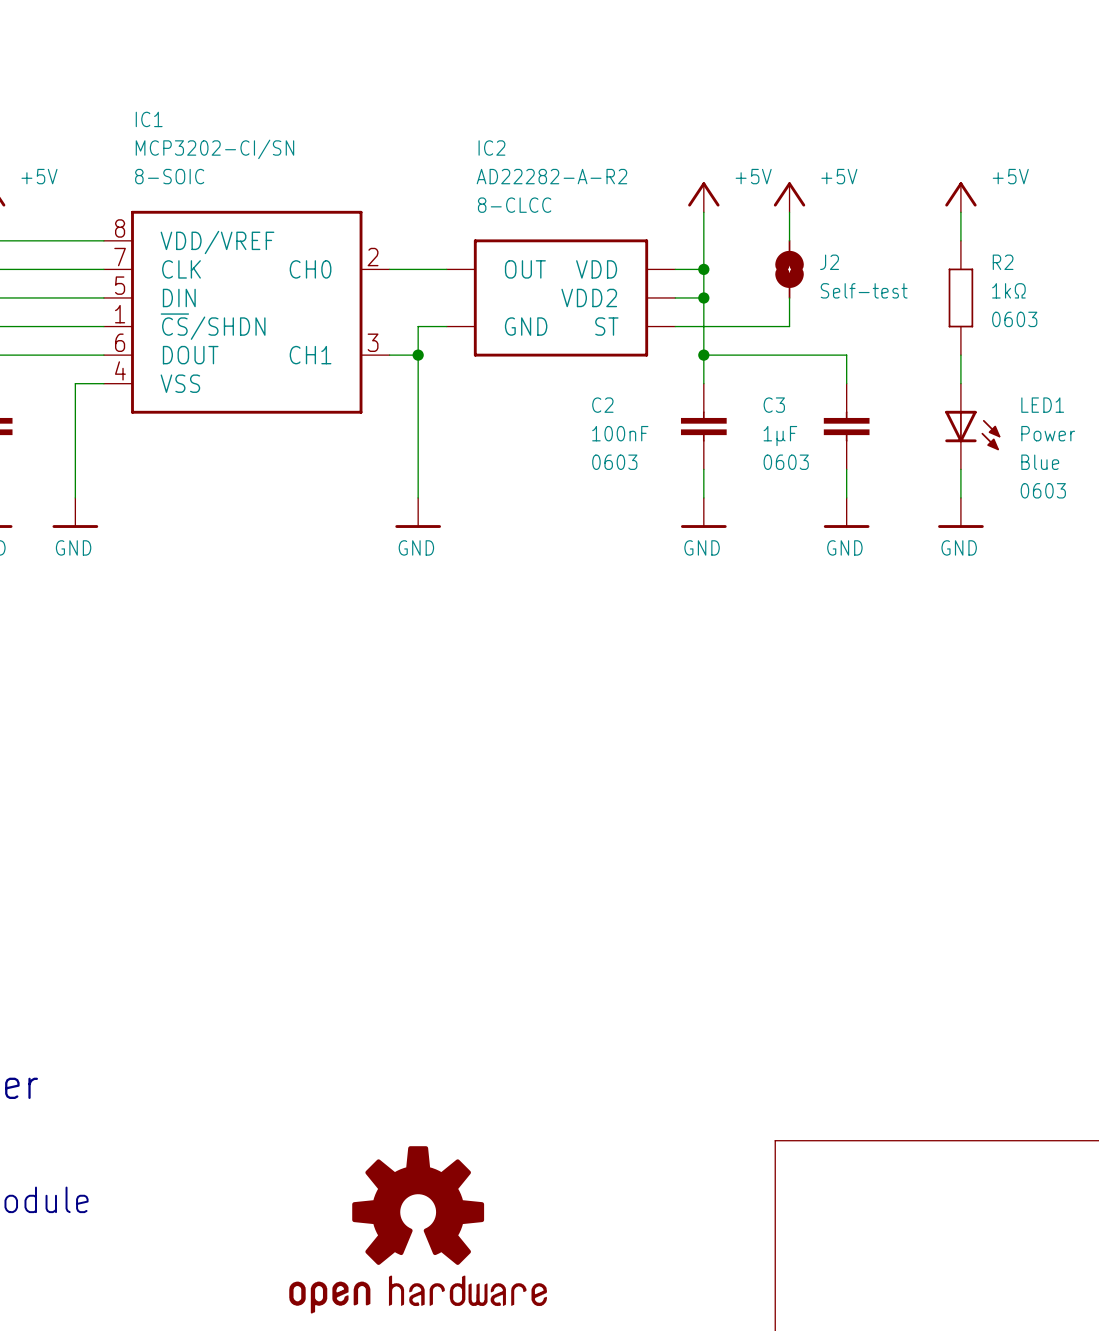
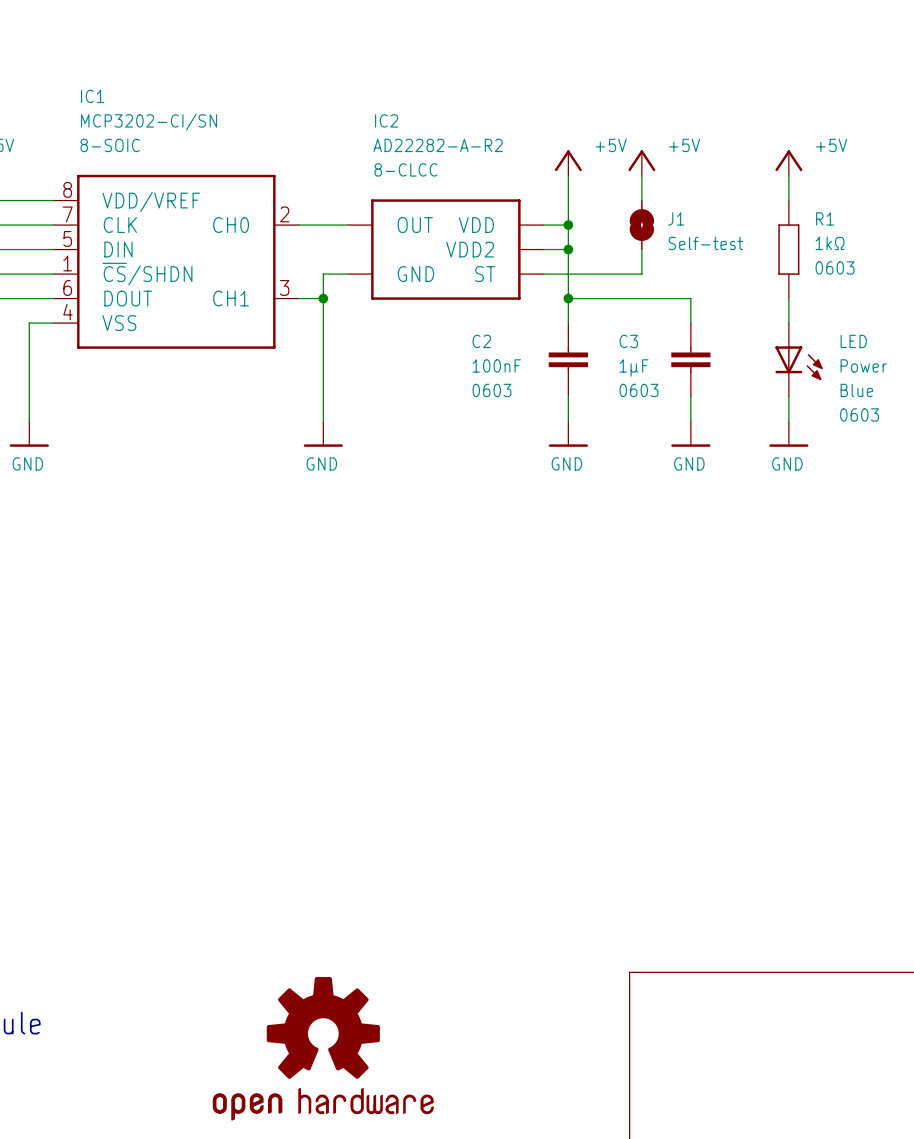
J2 name: J2 (829, 262) -> J1 (676, 218)
R2 name: R2 (1003, 262) -> R1 (825, 218)
LED1 name: LED1 (1042, 405) -> LED (853, 341)

